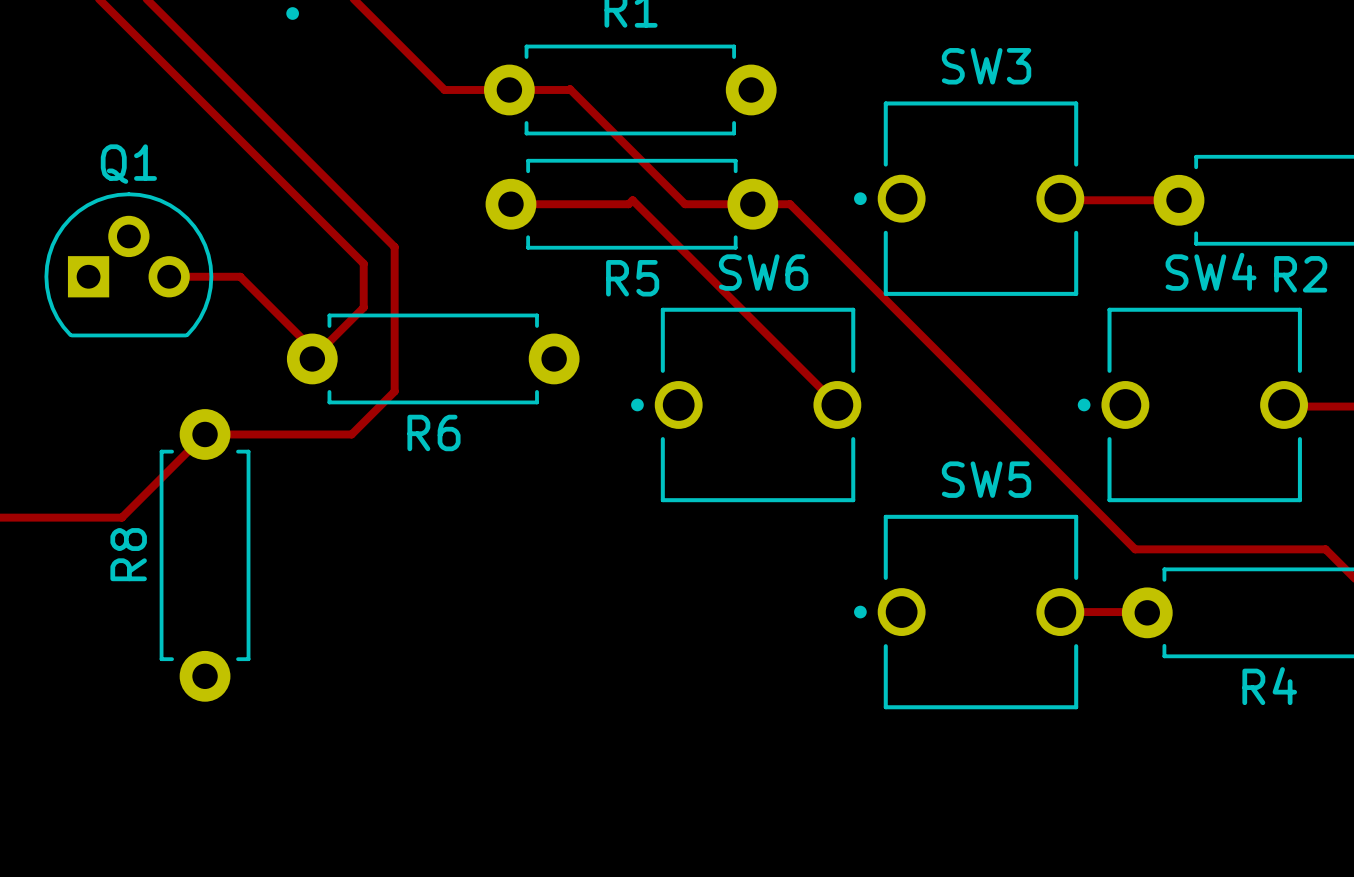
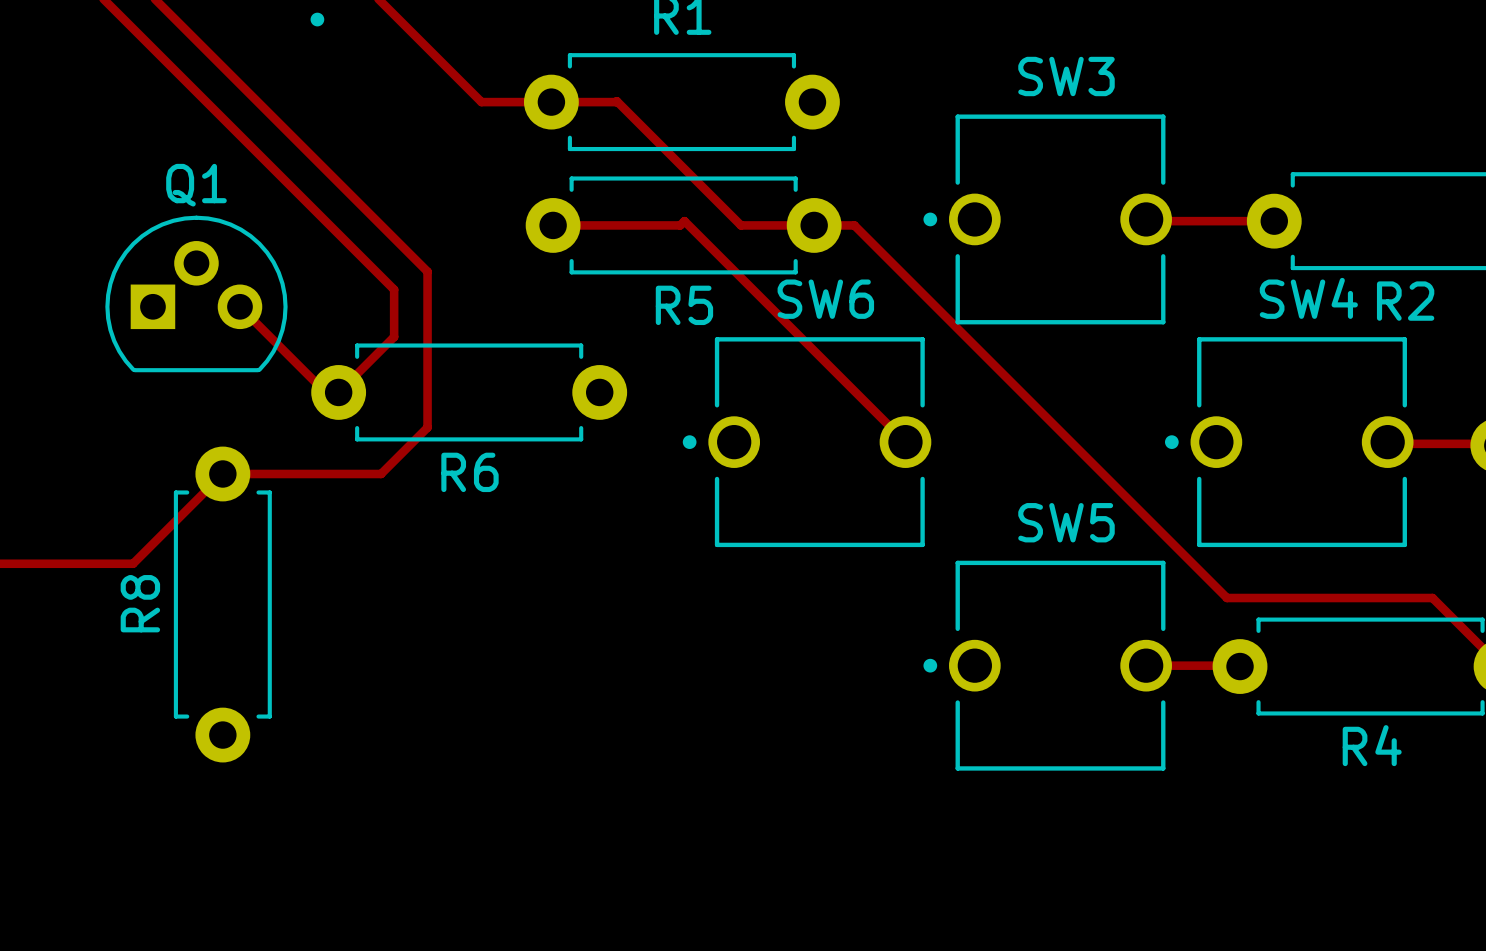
Q1 position: (128, 264) -> (196, 293)
track: (169, 276) (240, 276) (312, 348) (312, 358) -> (239, 306) (325, 392) (338, 392)

